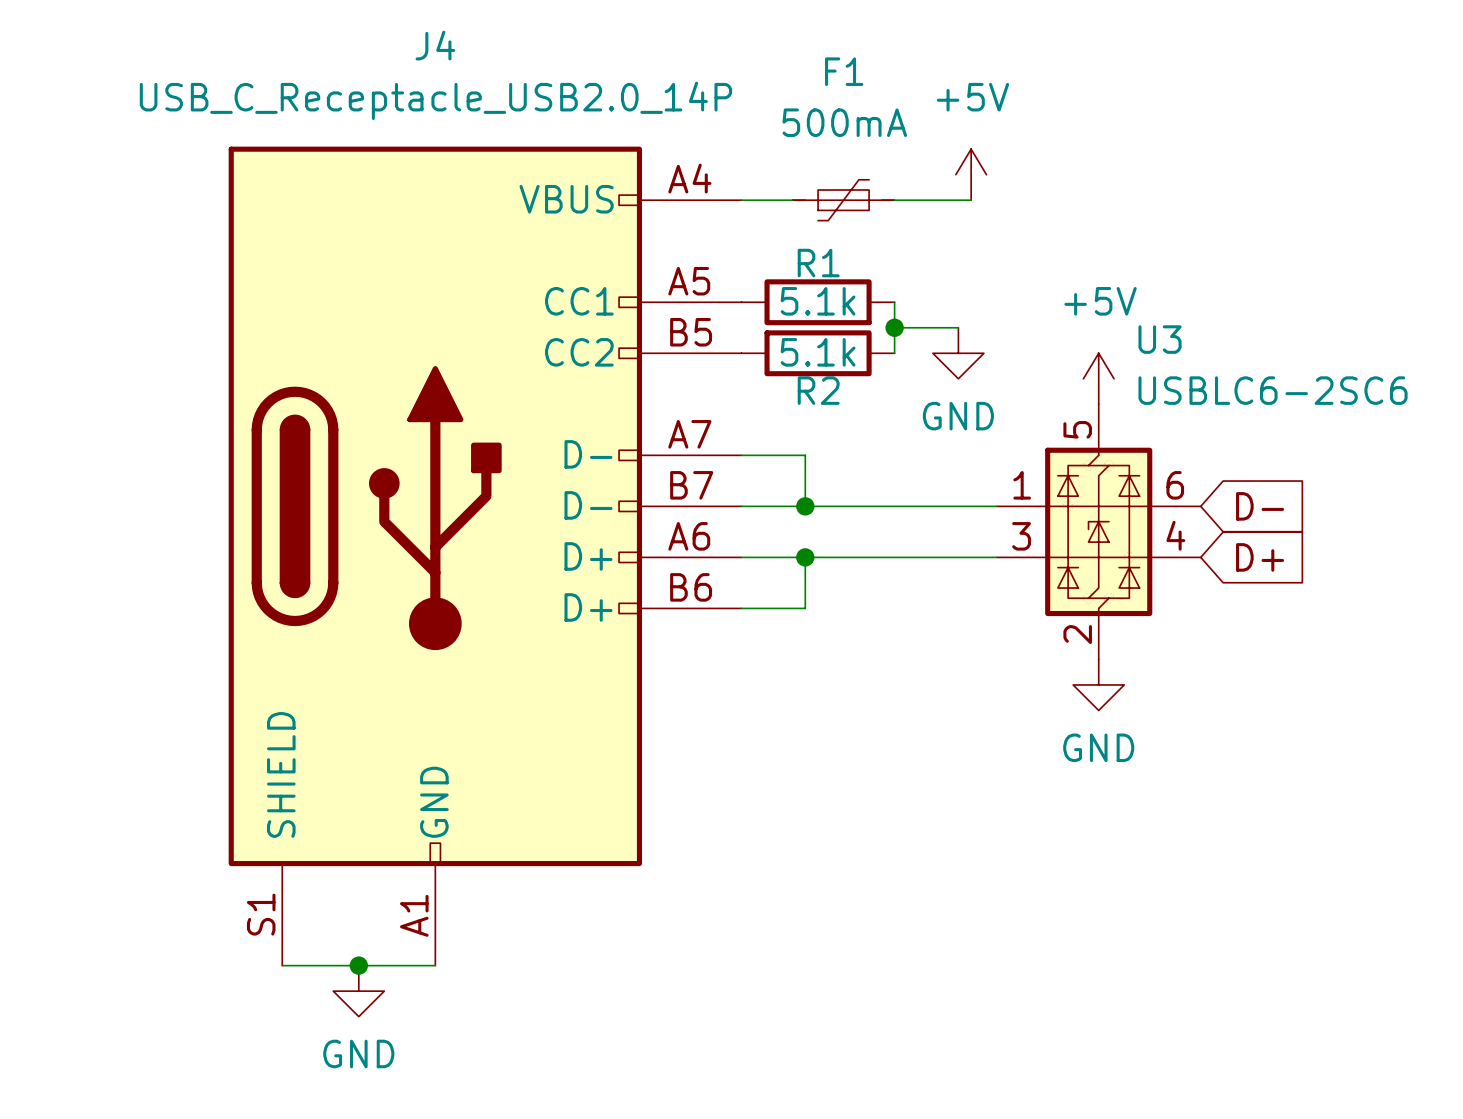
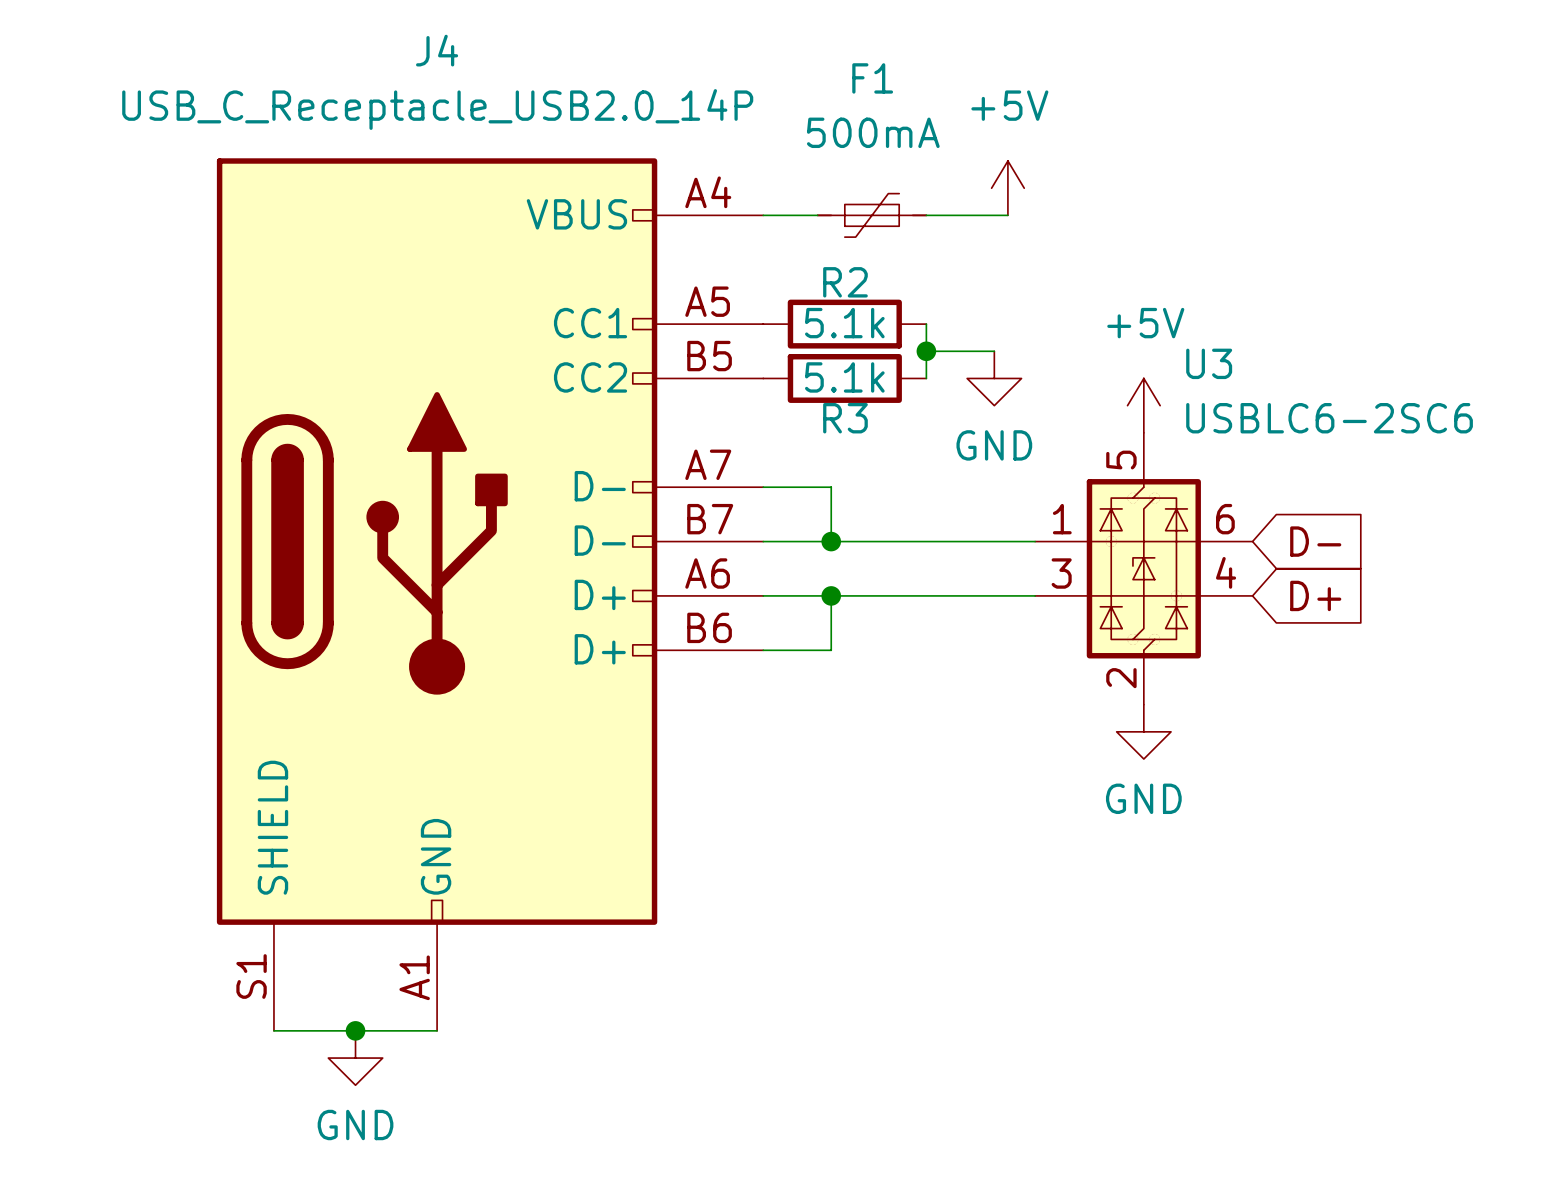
R1 name: R1 (818, 263) -> R2 (845, 282)
R2 name: R2 (818, 390) -> R3 (845, 418)

